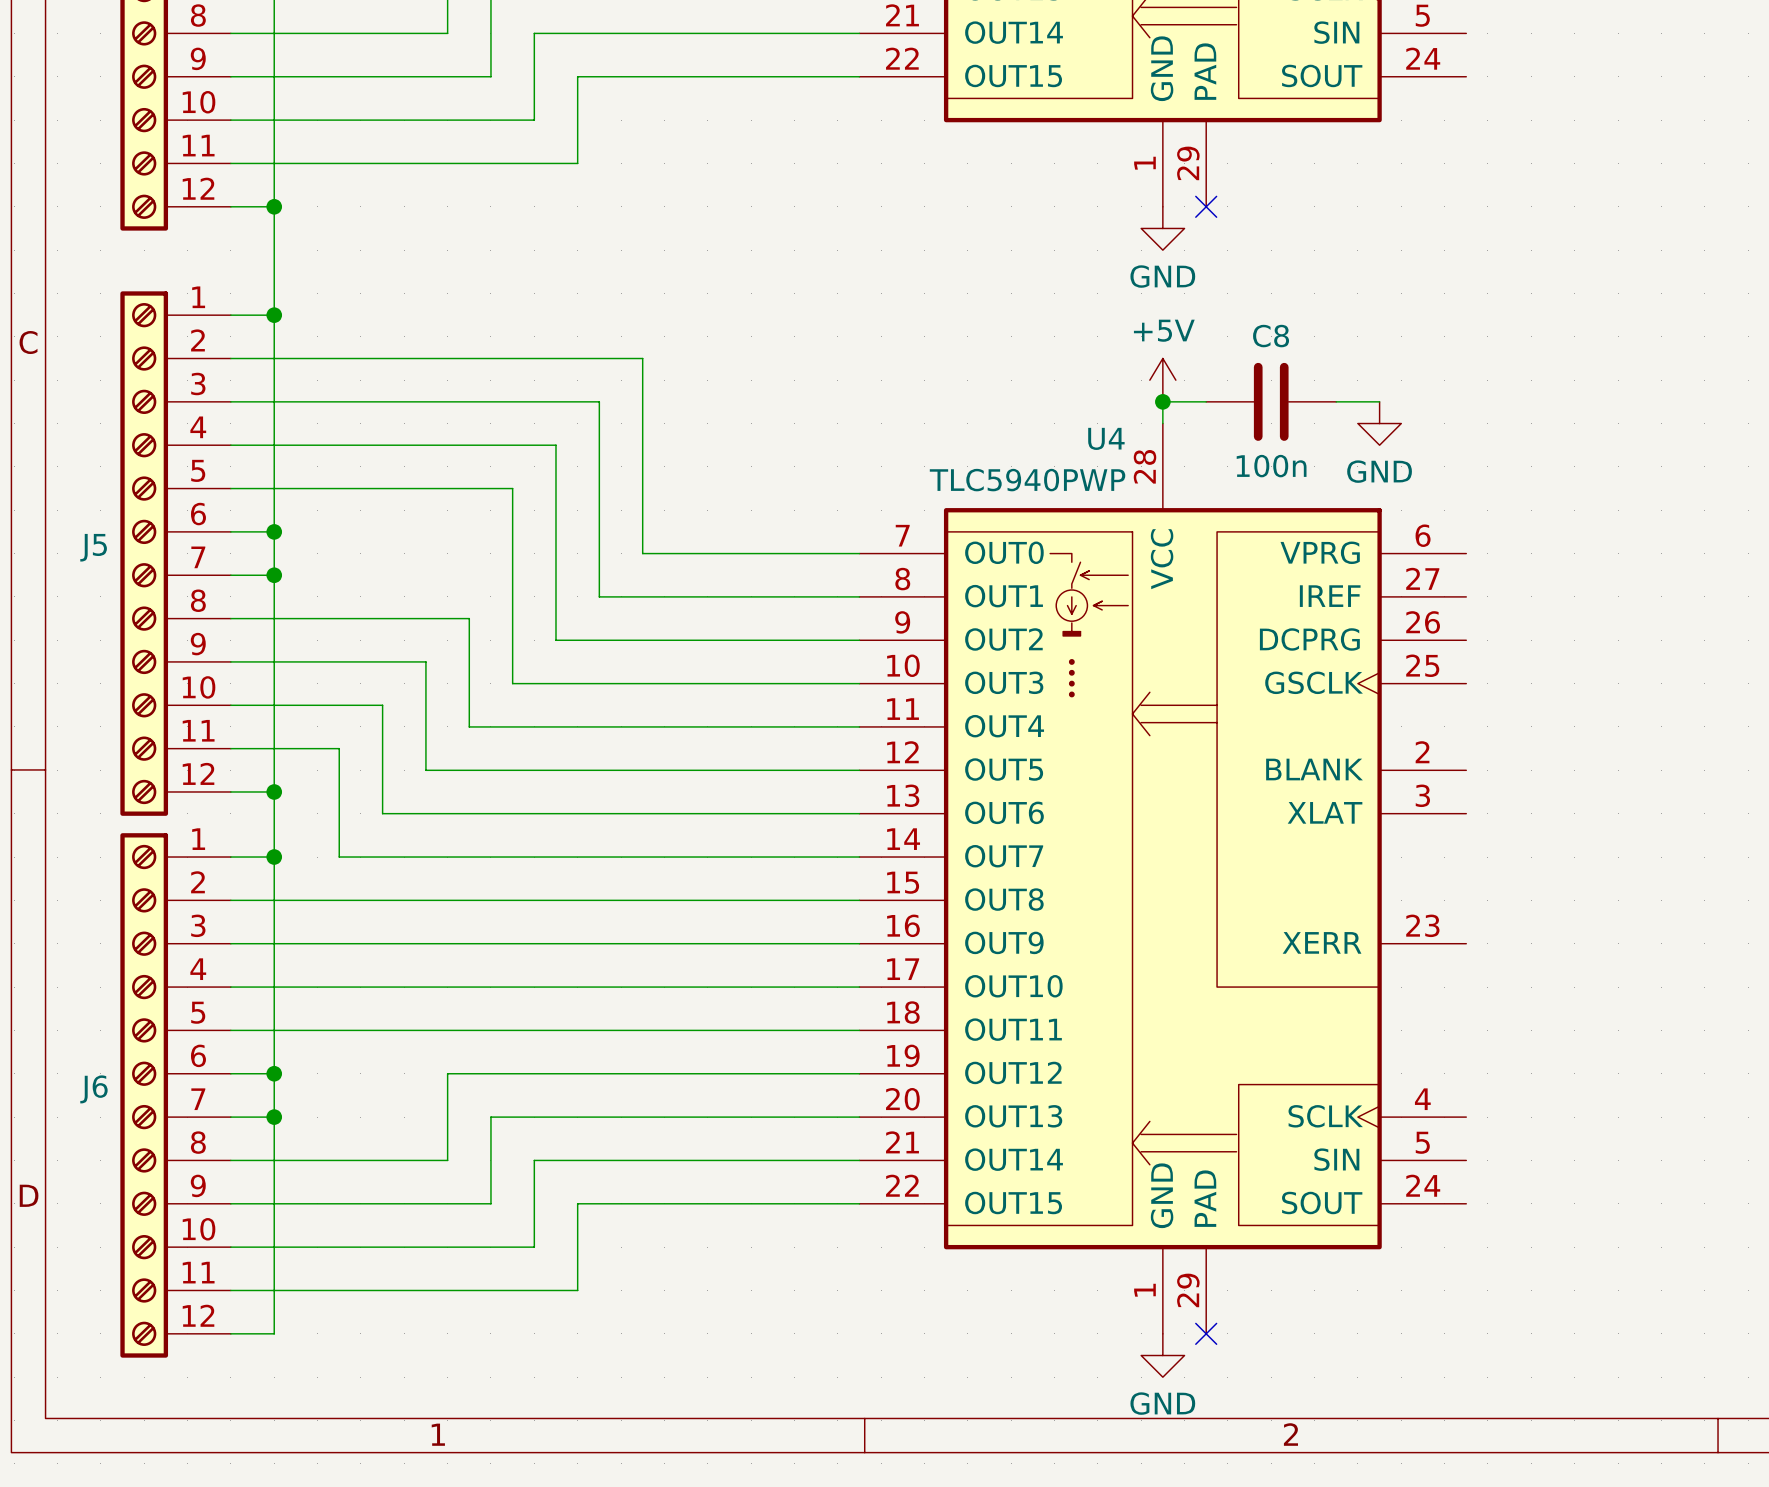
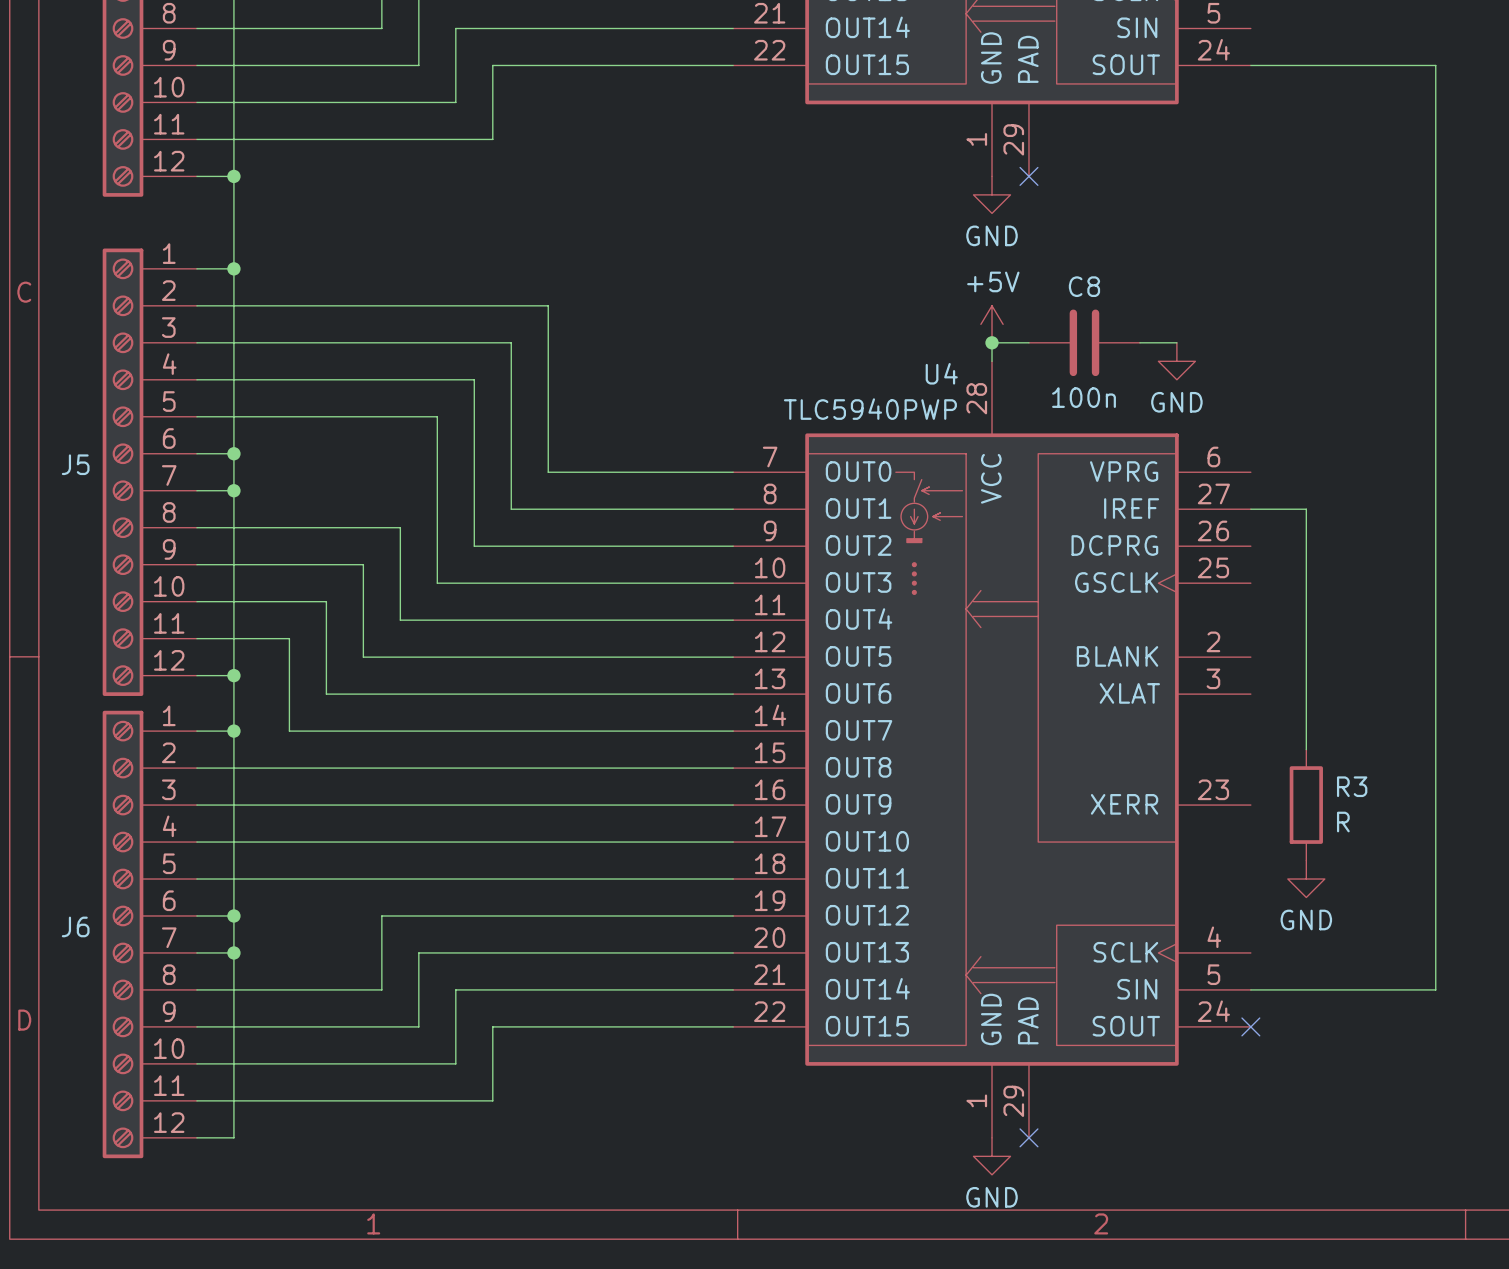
wire: none -> (1250, 65) (1435, 65) (1435, 989) (1250, 989)
wire: none -> (1250, 509) (1306, 509) (1306, 749)
R3: none -> R (1306, 805)
power symbol: none -> GND (1306, 879)
no-connect mark: none -> (1250, 1026)

